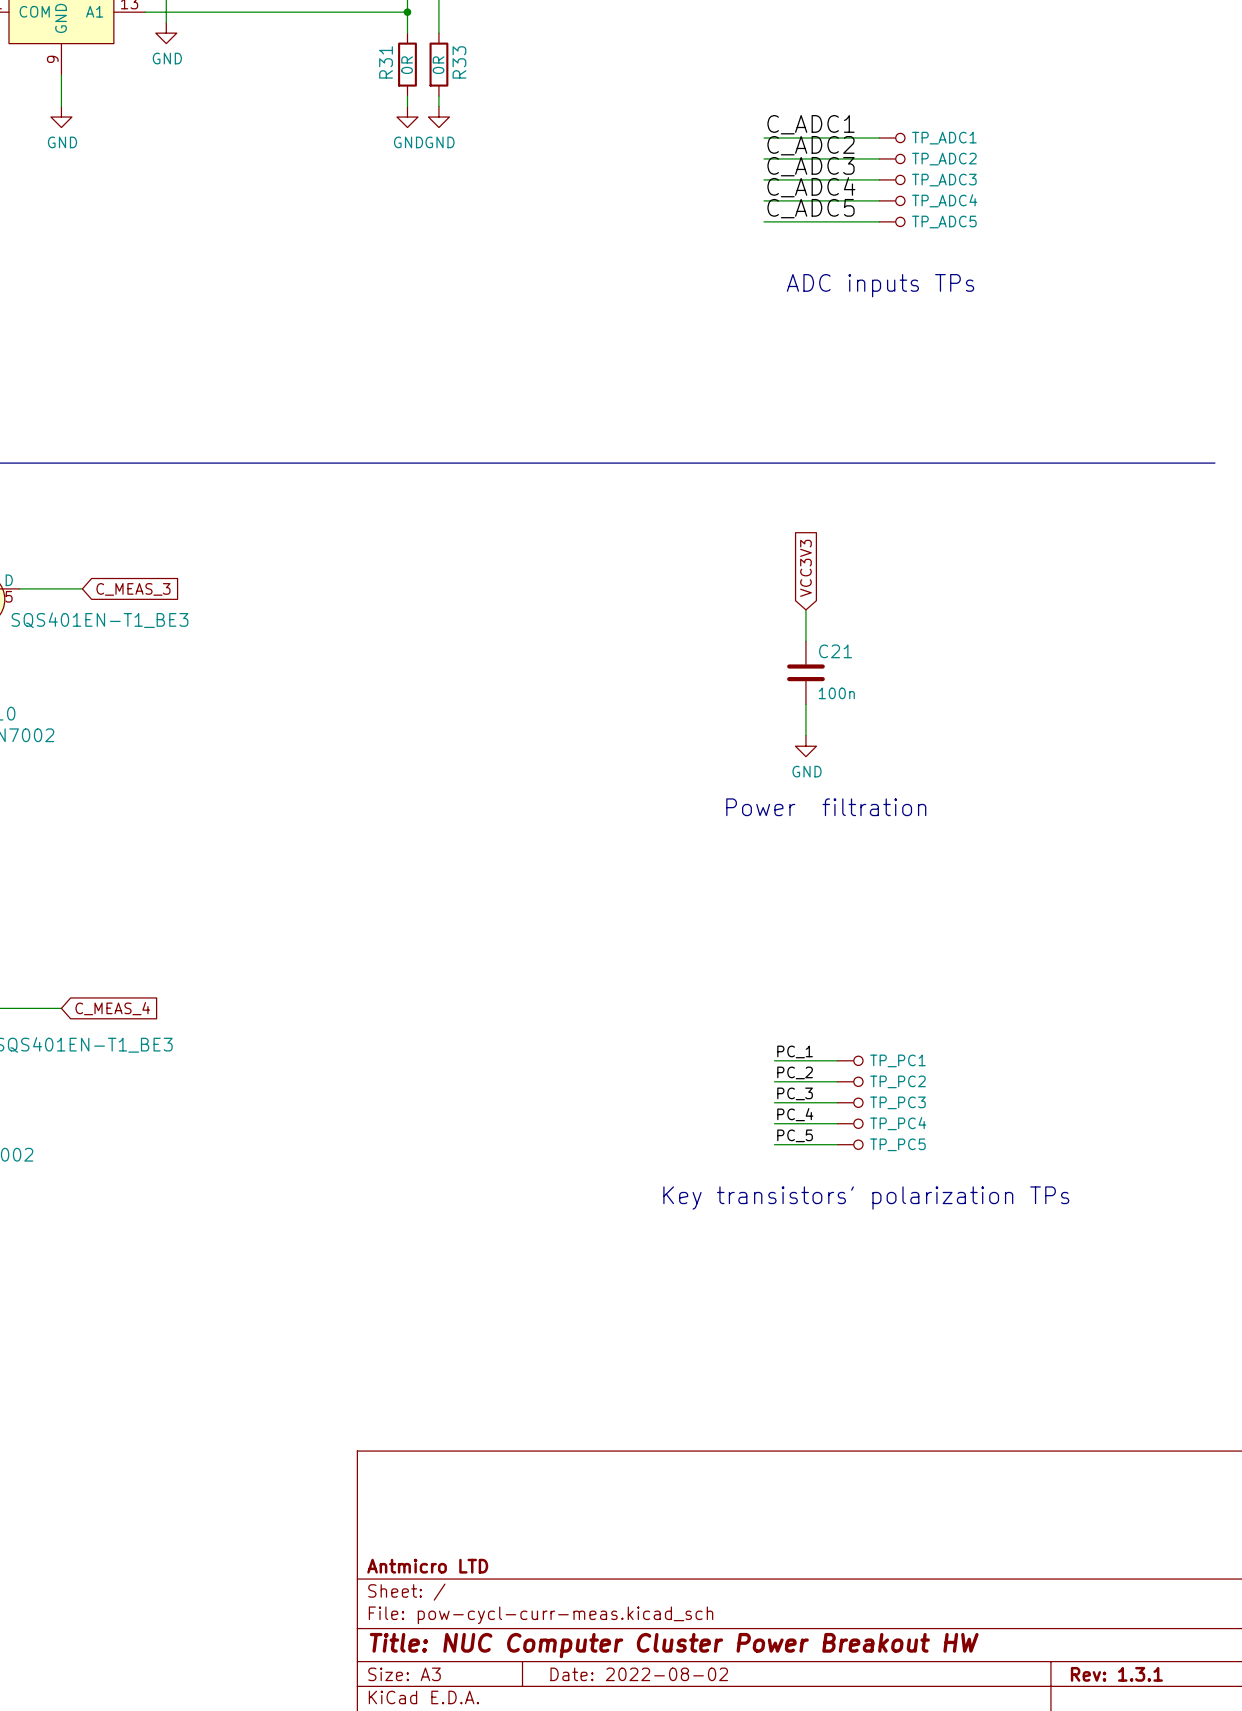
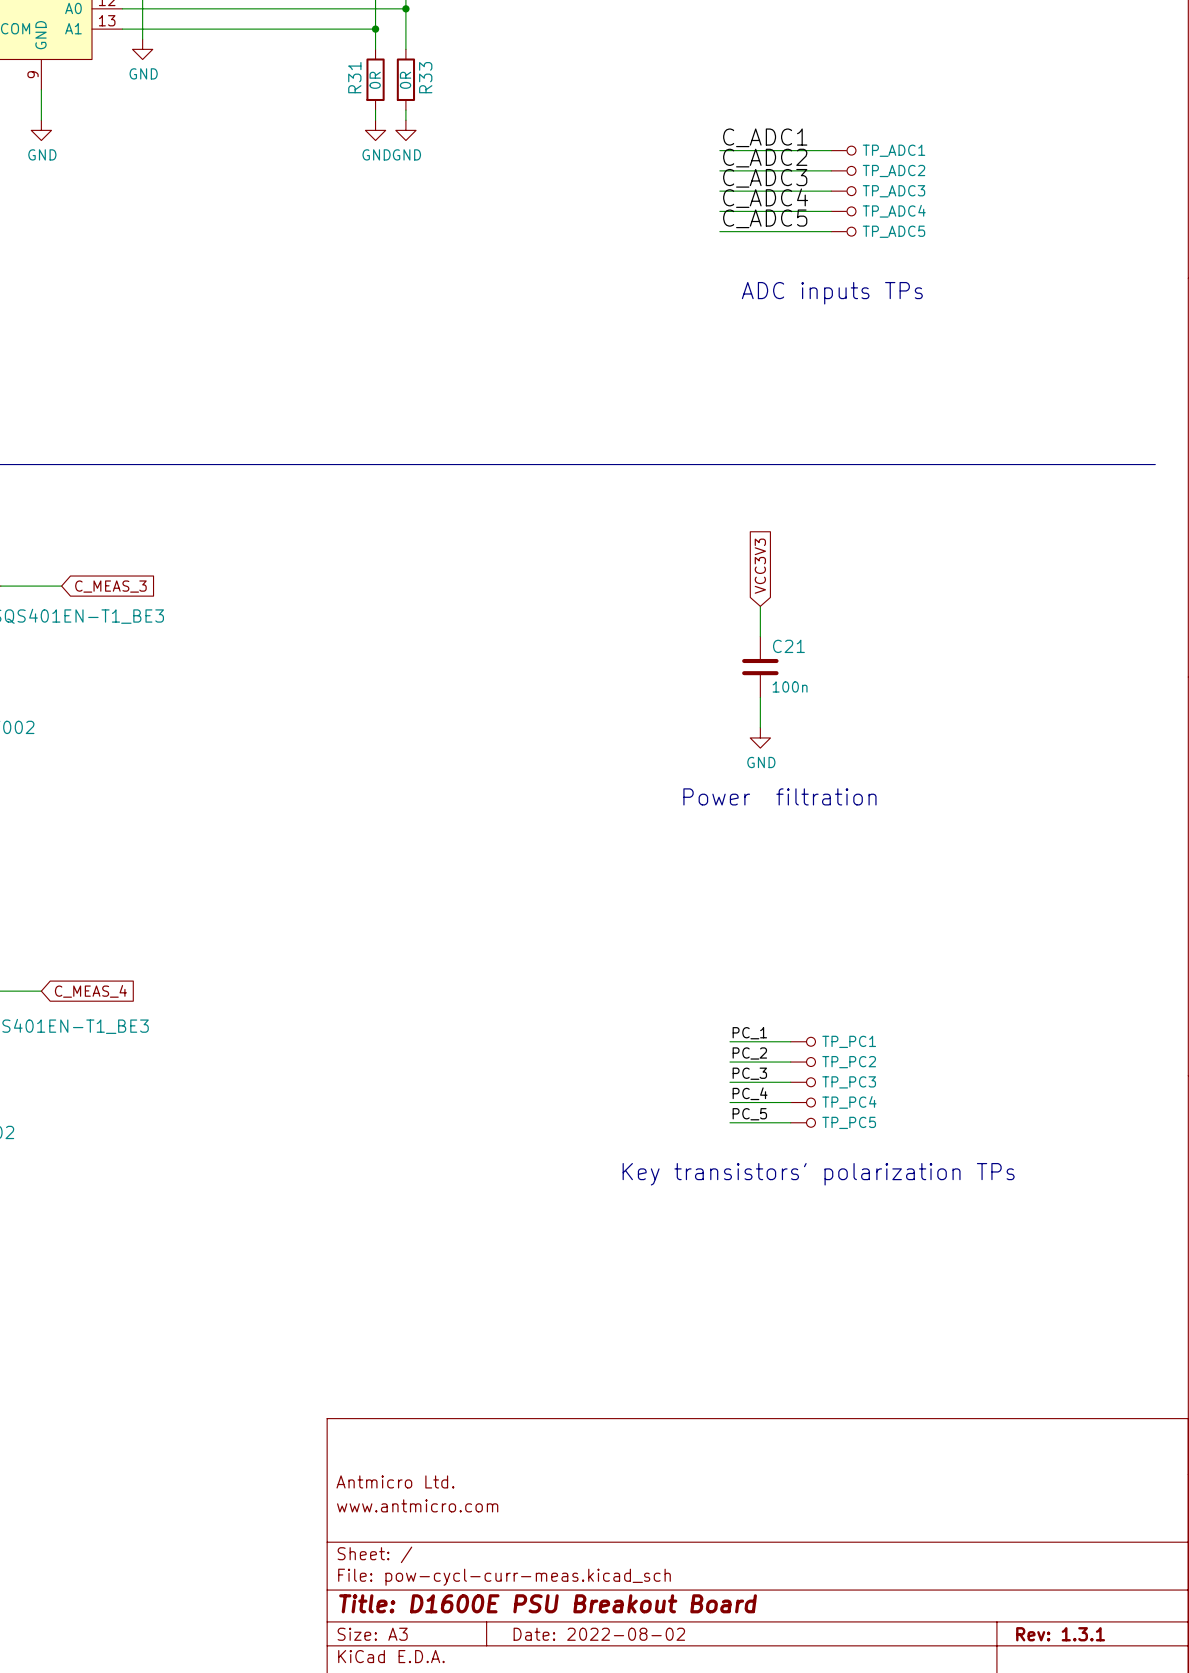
title block: none -> Antmicro Ltd. (395, 1481)
title block: none -> www.antmicro.com (417, 1505)
title block: Antmicro LTD (427, 1566) -> none
title block: Title: NUC Computer Cluster Power Breakout HW (674, 1645) -> Title: D1600E PSU Breakout Board (548, 1603)

